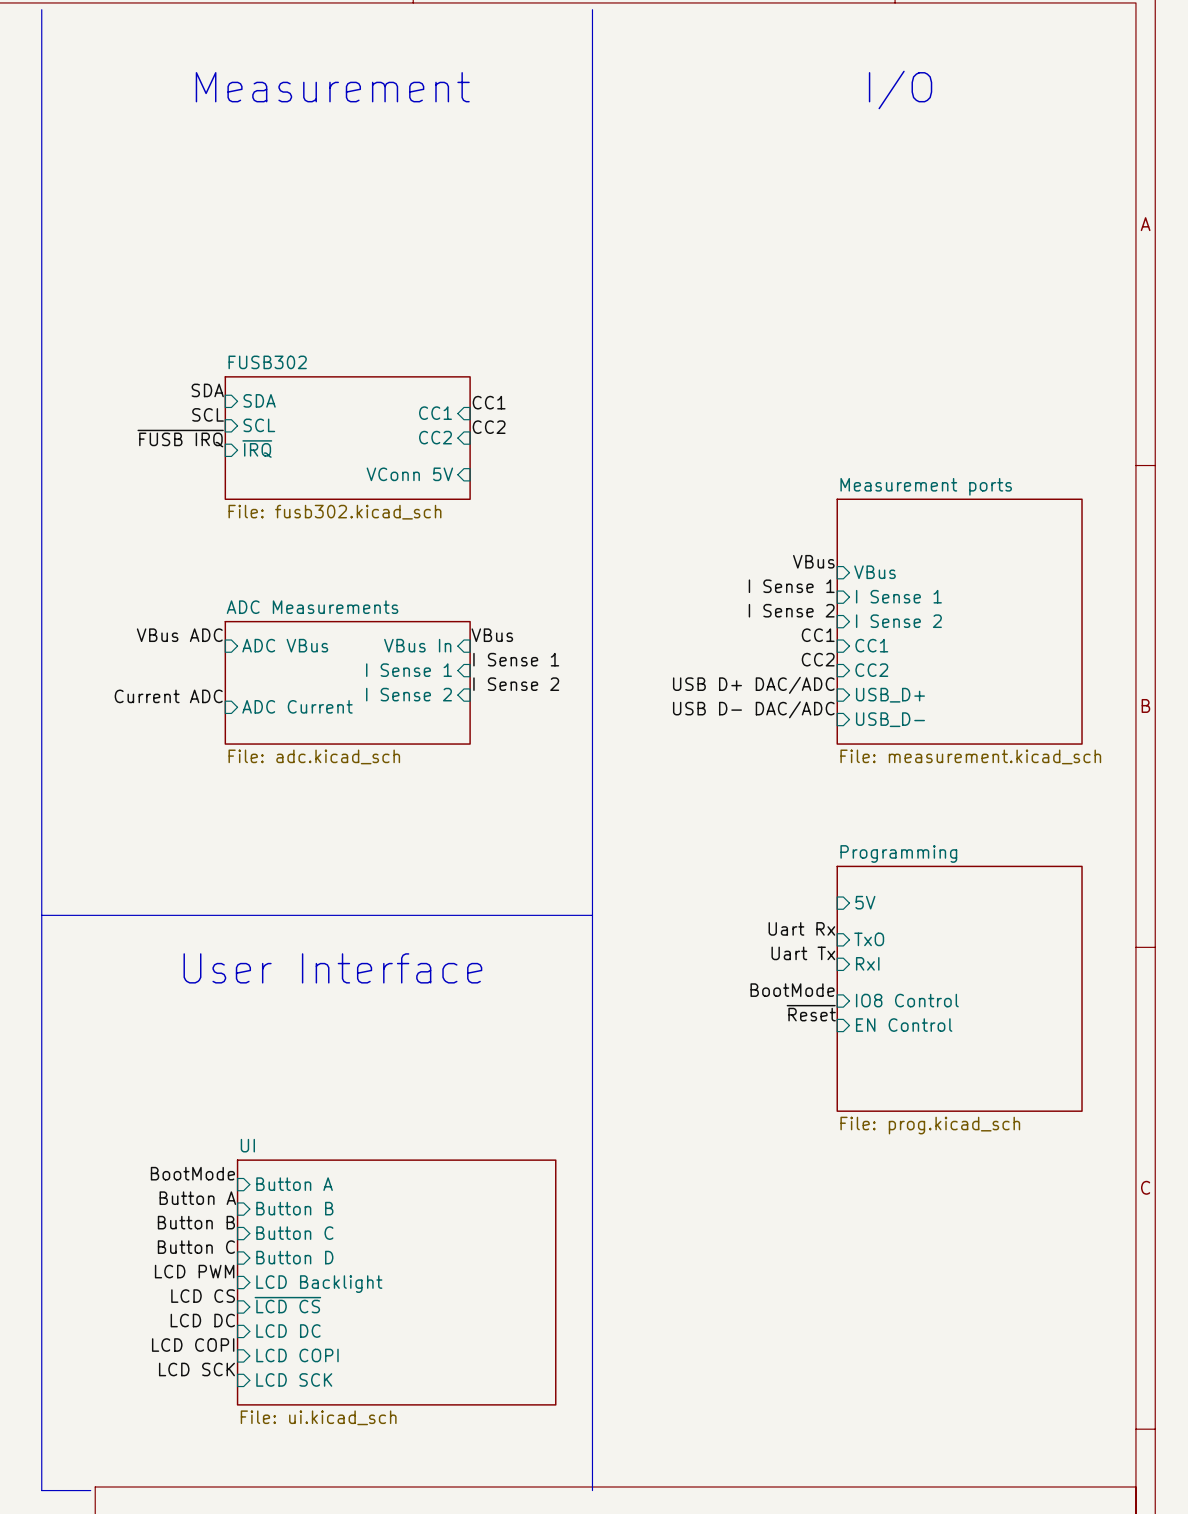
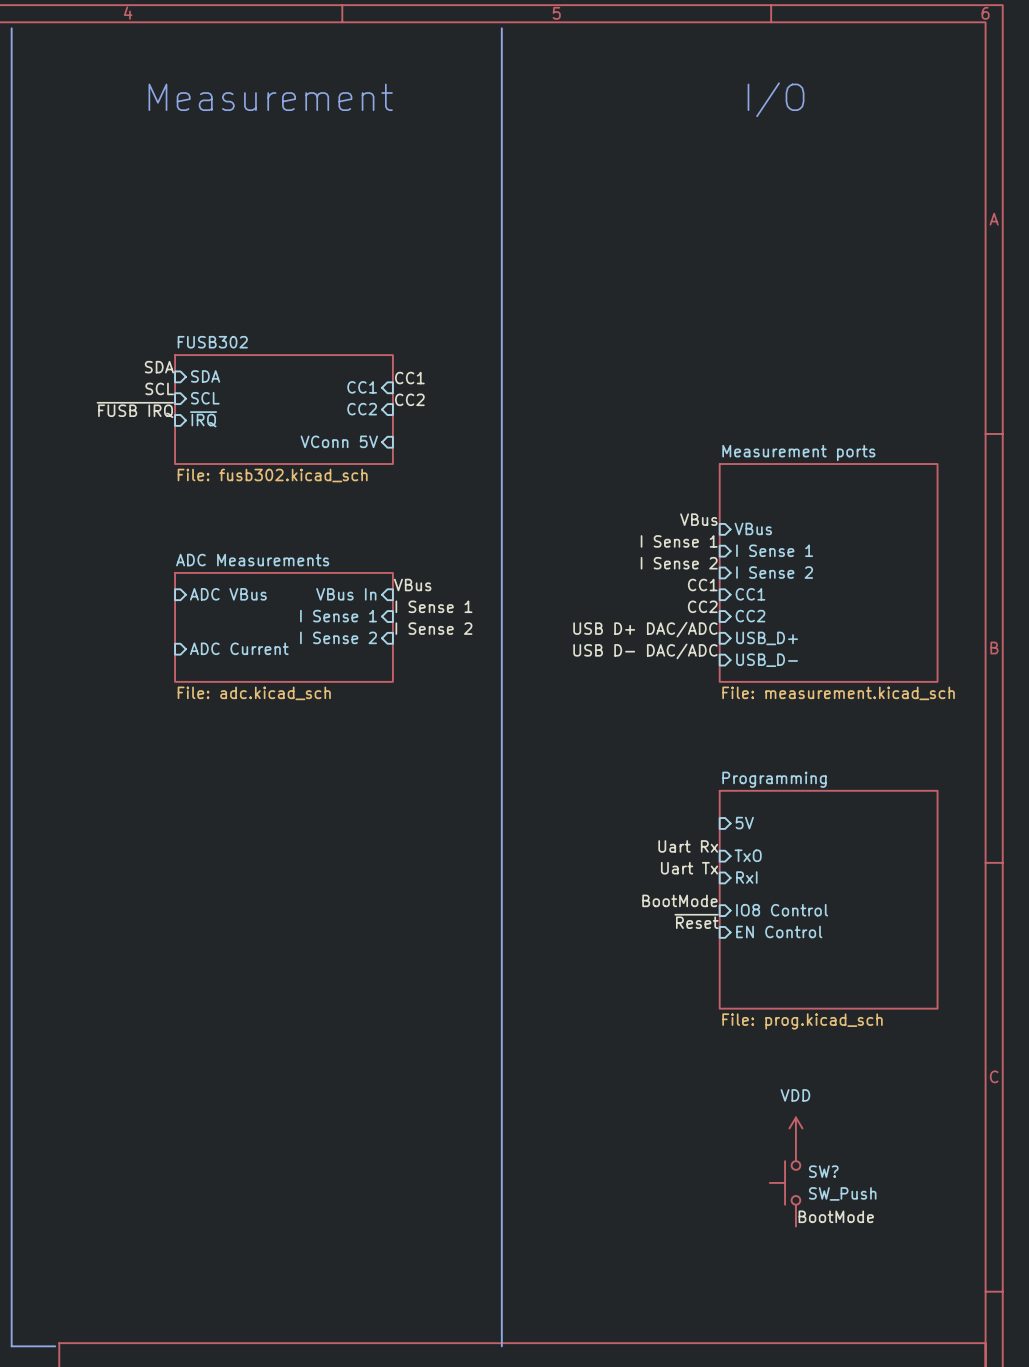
label: VBus ADC (179, 635) -> none
label: Current ADC (168, 696) -> none
line: (41, 915) (592, 915) -> none
text: User Interface (332, 968) -> none
label: BootMode (192, 1173) -> none
sheet pin: Button A (294, 1184) -> none
label: Button A (197, 1198) -> none
sheet pin: Button B (294, 1208) -> none
label: Button B (196, 1222) -> none
sheet pin: Button C (294, 1233) -> none
power symbol: none -> VDD (795, 1128)
label: Button C (196, 1247) -> none
sheet pin: Button D (294, 1257) -> none
label: LCD PWM (194, 1271) -> none
sheet UI: File: ui.kicad_sch (396, 1282) -> none
sheet pin: LCD Backlight (319, 1284) -> none
label: LCD CS (203, 1296) -> none
sheet pin: ~{LCD CS} (287, 1305) -> none
SW?: none -> SW_Push (785, 1182)
label: LCD DC (202, 1320) -> none
sheet pin: LCD DC (288, 1331) -> none
label: LCD COPI (193, 1345) -> none
label: none -> BootMode (836, 1216)
sheet pin: LCD COPI (297, 1355) -> none
label: LCD SCK (196, 1369) -> none
sheet pin: LCD SCK (294, 1379) -> none

